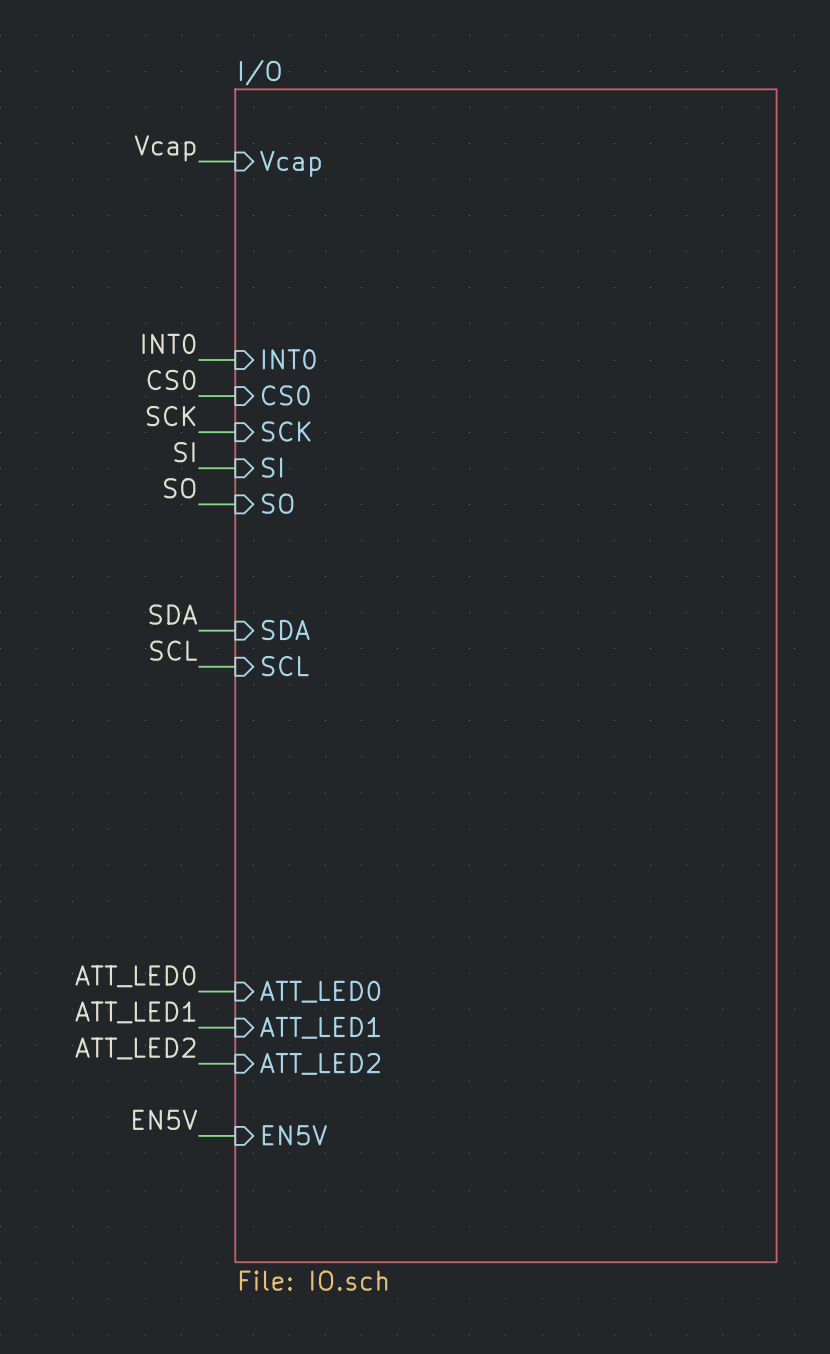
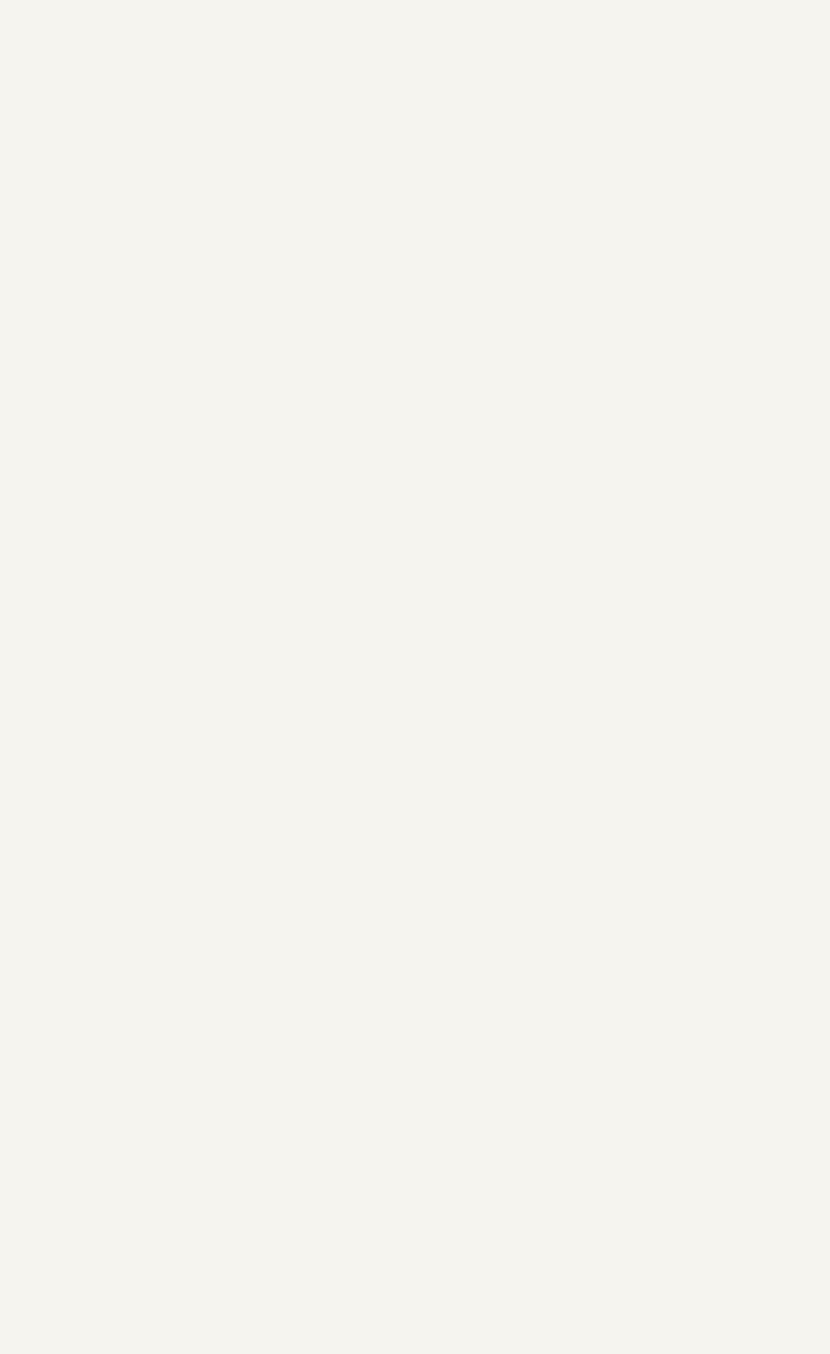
label: Vcap (165, 148) -> none
wire: (199, 161) (235, 161) -> none
sheet pin: Vcap (290, 163) -> none
label: INT0 (168, 343) -> none
sheet pin: INT0 (289, 359) -> none
wire: (199, 360) (235, 360) -> none
label: CS0 (171, 379) -> none
sheet pin: CS0 (285, 395) -> none
wire: (199, 396) (235, 396) -> none
label: SCK (171, 416) -> none
sheet pin: SCK (286, 431) -> none
wire: (199, 432) (235, 432) -> none
label: SI (184, 452) -> none
sheet pin: SI (272, 467) -> none
wire: (199, 468) (235, 468) -> none
label: SO (179, 488) -> none
sheet pin: SO (277, 503) -> none
wire: (199, 504) (235, 504) -> none
label: SDA (173, 614) -> none
sheet pin: SDA (285, 629) -> none
wire: (199, 630) (235, 630) -> none
label: SCL (173, 650) -> none
wire: (199, 666) (235, 666) -> none
sheet pin: SCL (285, 666) -> none
sheet I/O: File: IO.sch (505, 675) -> none
label: ATT_LED0 (135, 976) -> none
wire: (199, 991) (235, 991) -> none
sheet pin: ATT_LED0 (320, 991) -> none
label: ATT_LED1 (135, 1012) -> none
wire: (199, 1027) (235, 1027) -> none
sheet pin: ATT_LED1 (320, 1027) -> none
label: ATT_LED2 (135, 1048) -> none
wire: (199, 1063) (235, 1063) -> none
sheet pin: ATT_LED2 (320, 1063) -> none
label: EN5V (165, 1119) -> none
wire: (199, 1135) (235, 1135) -> none
sheet pin: EN5V (294, 1135) -> none

